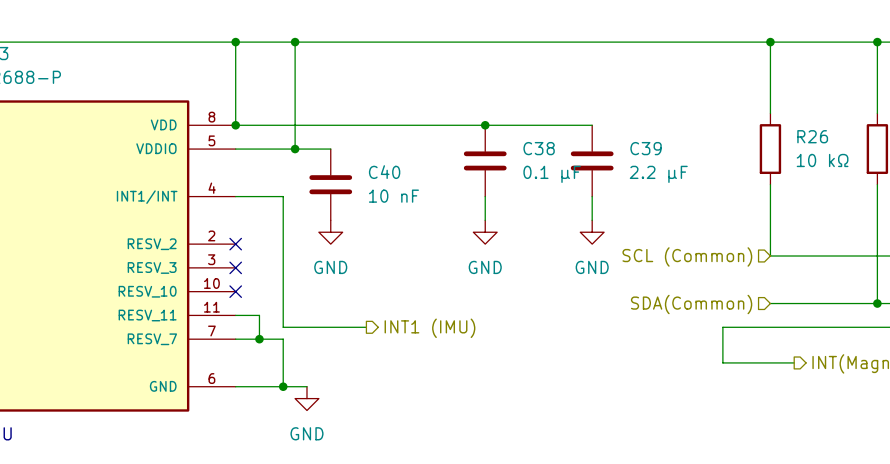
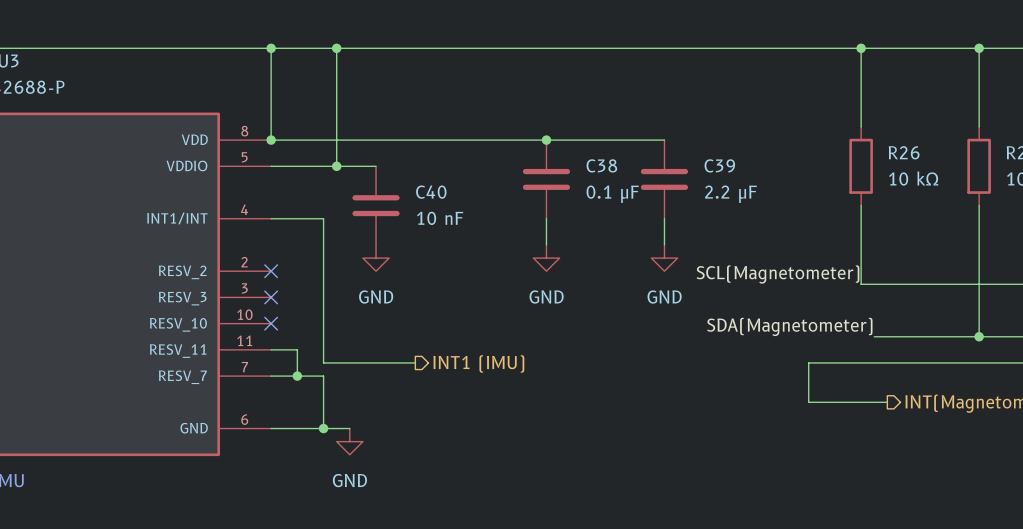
label: none -> SCL(Magnetometer) (778, 274)
hierarchical label: SCL (Common) (687, 256) -> none
label: none -> SDA(Magnetometer) (789, 326)
wire: (770, 303) (782, 303) -> none
hierarchical label: SDA(Common) (691, 304) -> none

